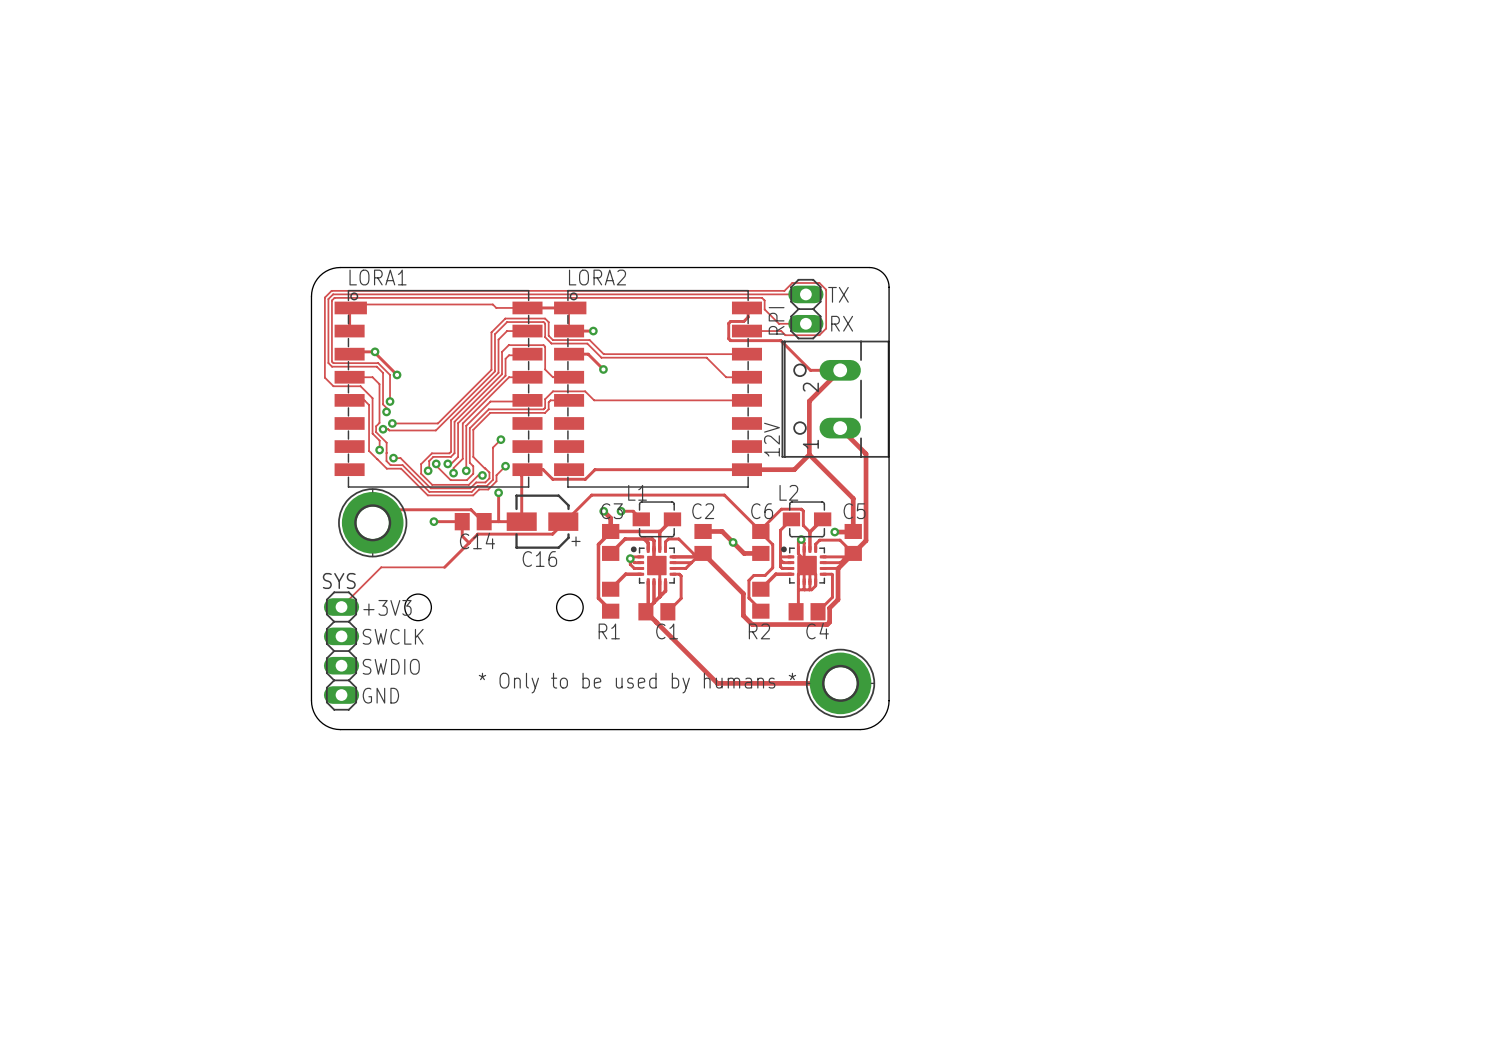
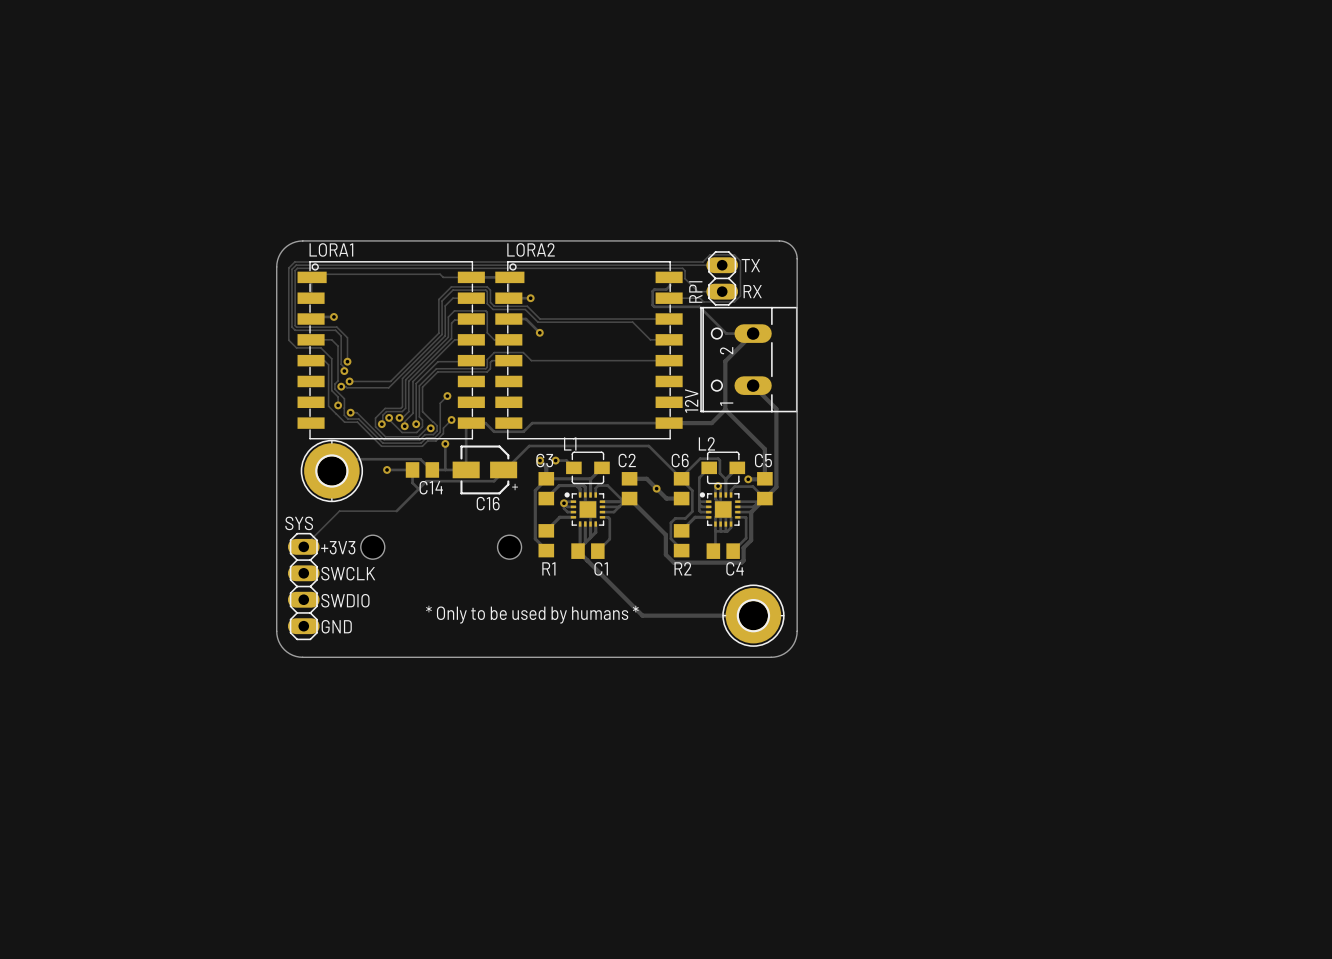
track: (373, 351) (397, 374) -> none
via: (397, 374) -> none

